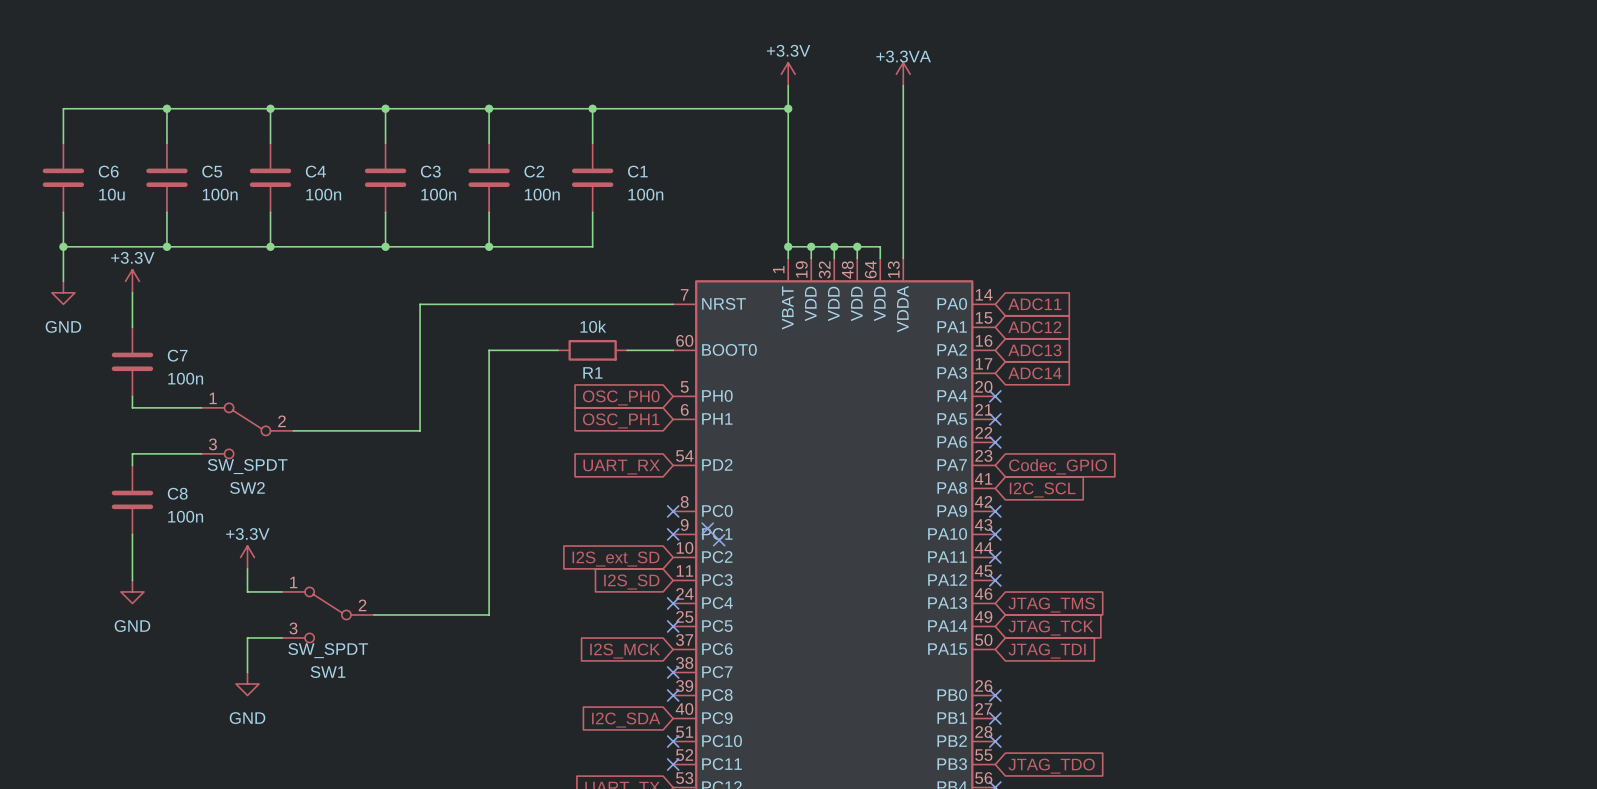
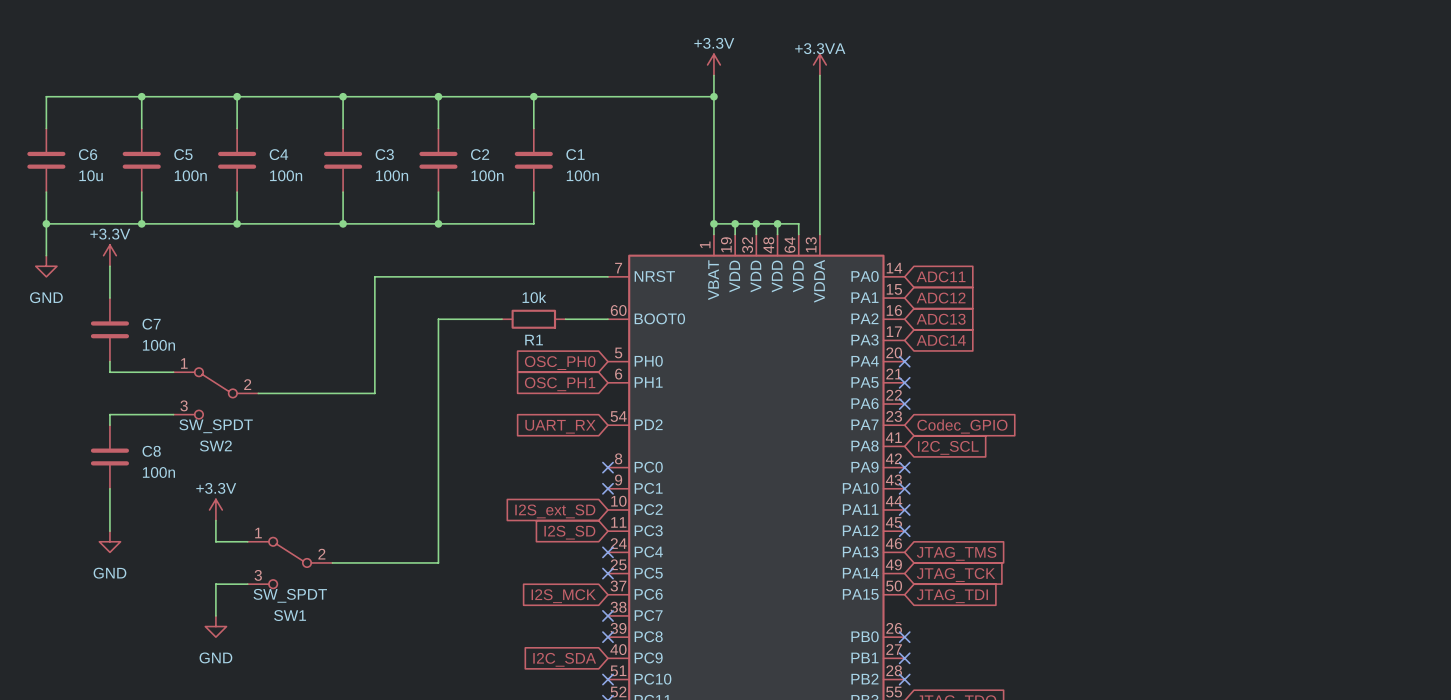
no-connect mark: (707, 528) -> none
no-connect mark: (719, 540) -> none

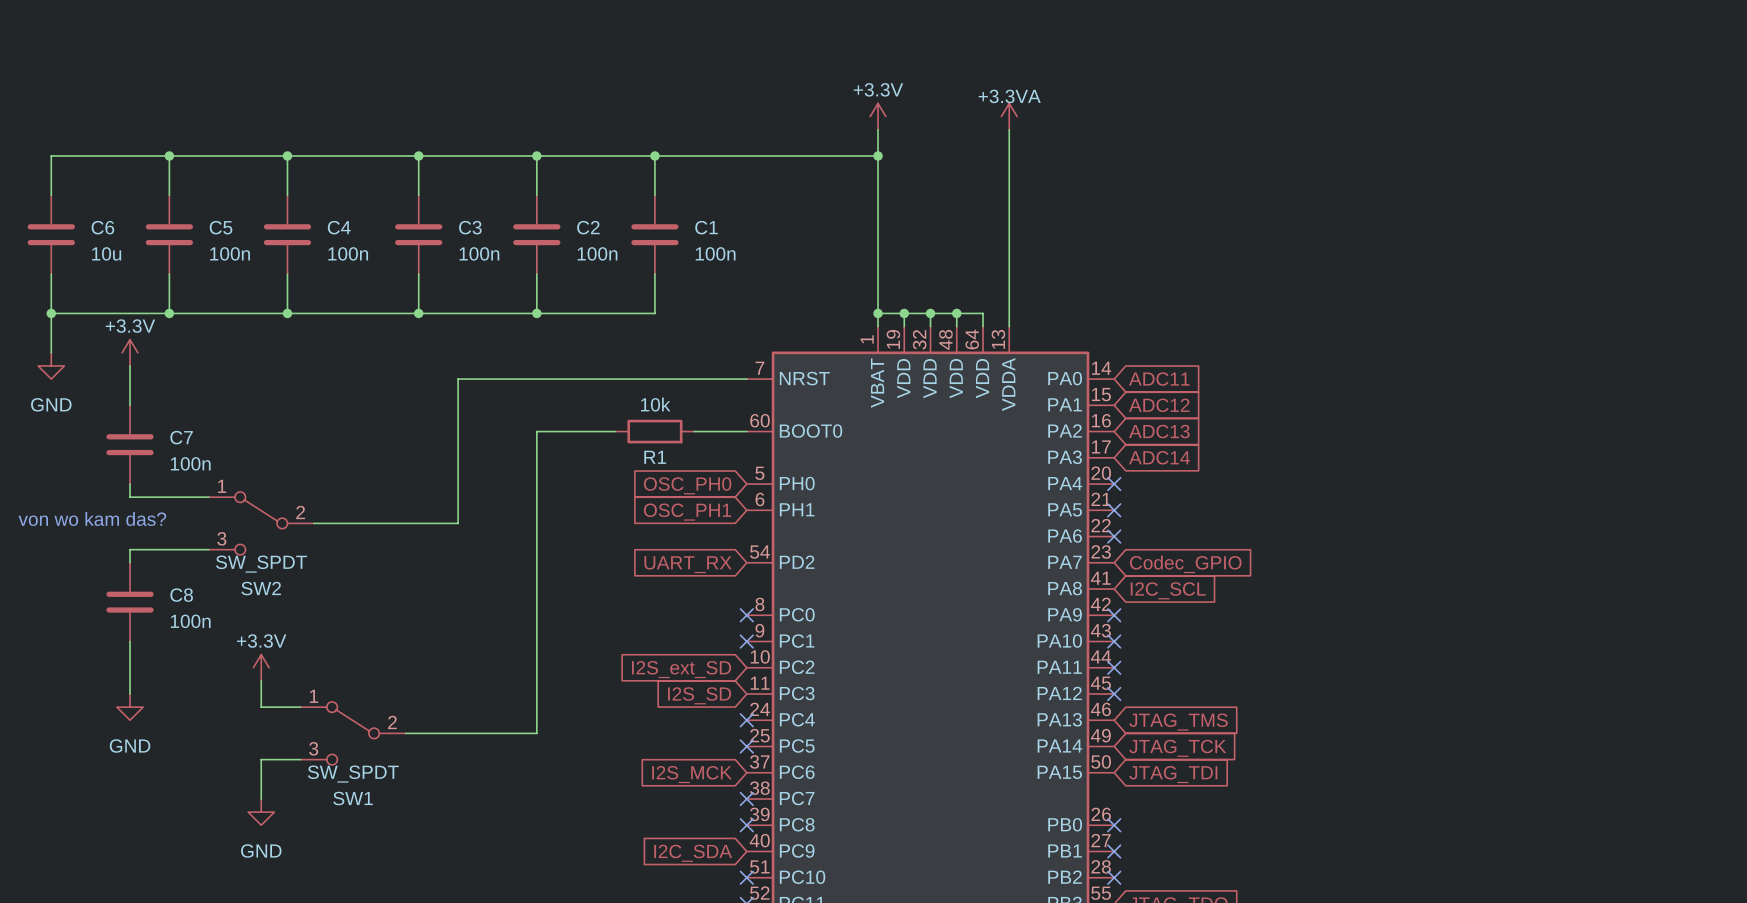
text: none -> von wo kam das? (92, 518)

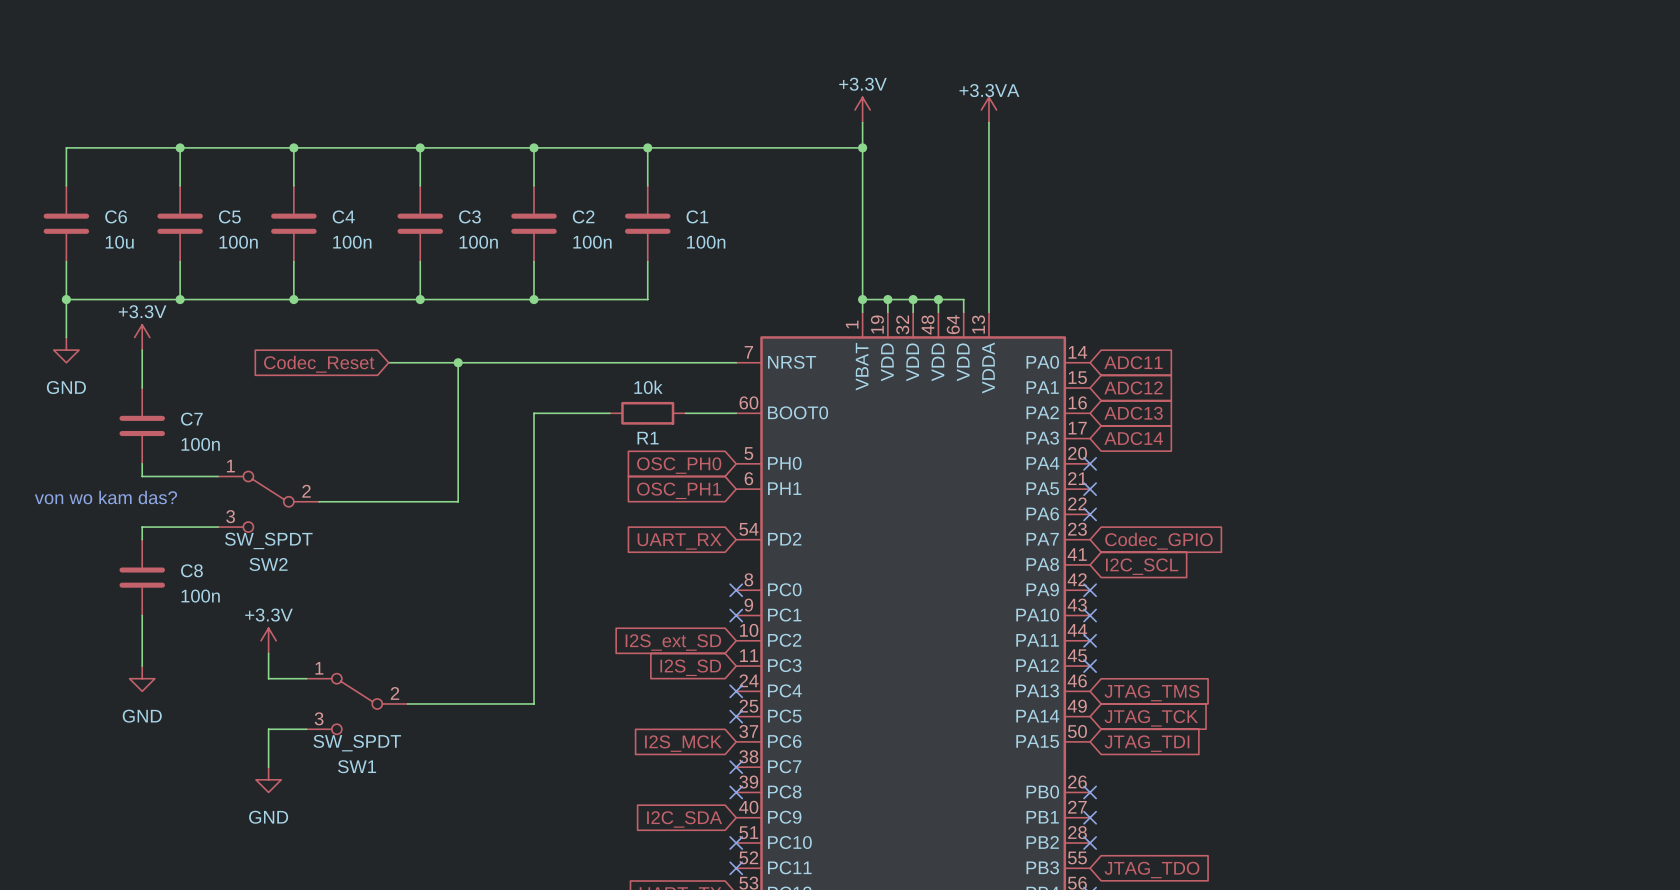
wire: none -> (388, 362) (458, 362)
junction: none -> (458, 362)
global label: none -> Codec_Reset (319, 364)

